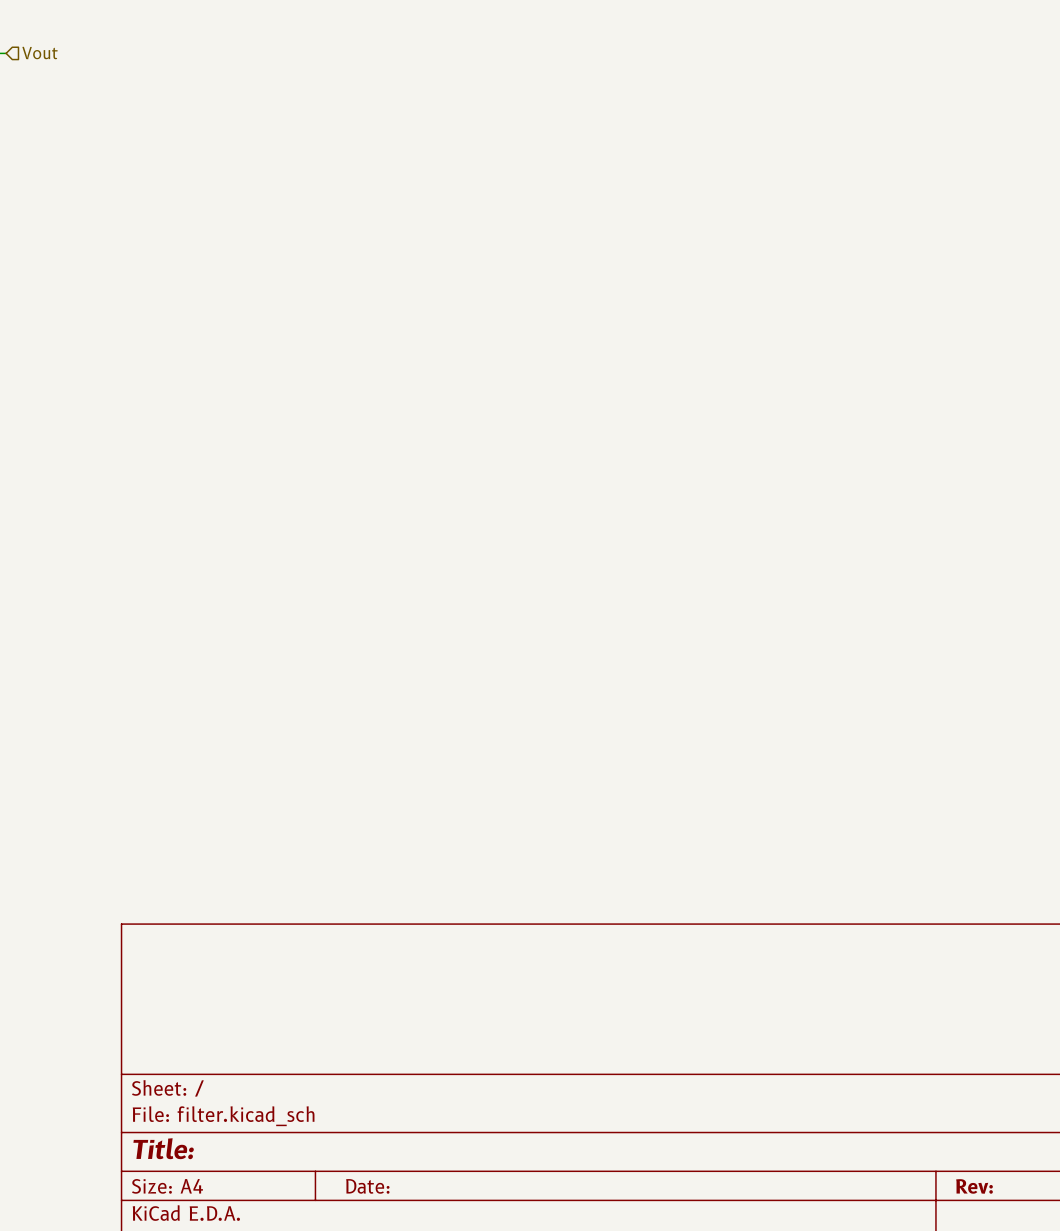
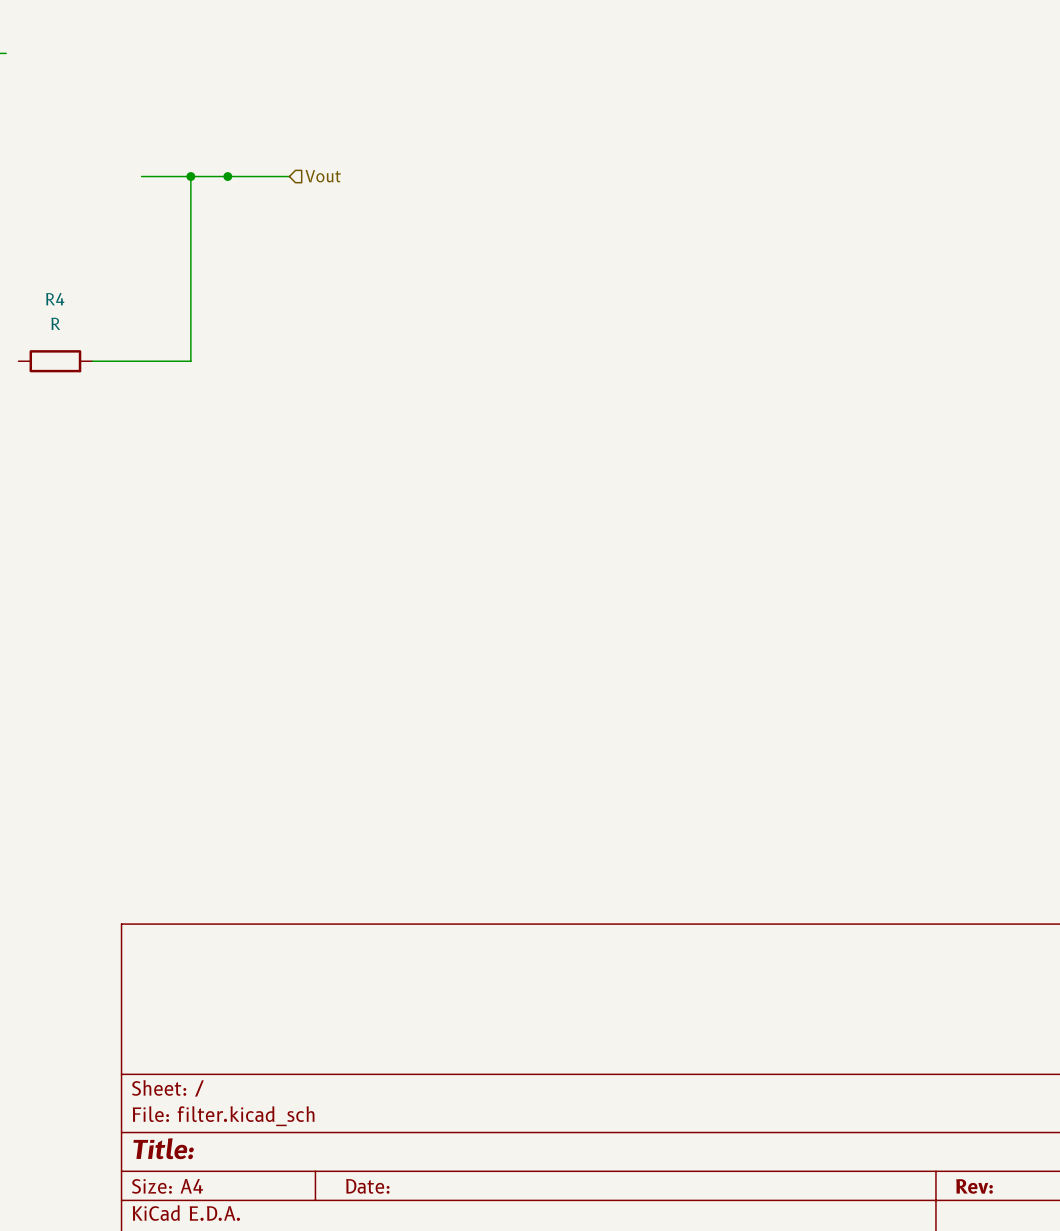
hierarchical label: Vout (39, 53) -> none
wire: none -> (141, 176) (289, 176)
wire: none -> (190, 176) (190, 361) (92, 361)
junction: none -> (190, 176)
junction: none -> (227, 176)
hierarchical label: none -> Vout (323, 176)
R4: none -> R (55, 361)

